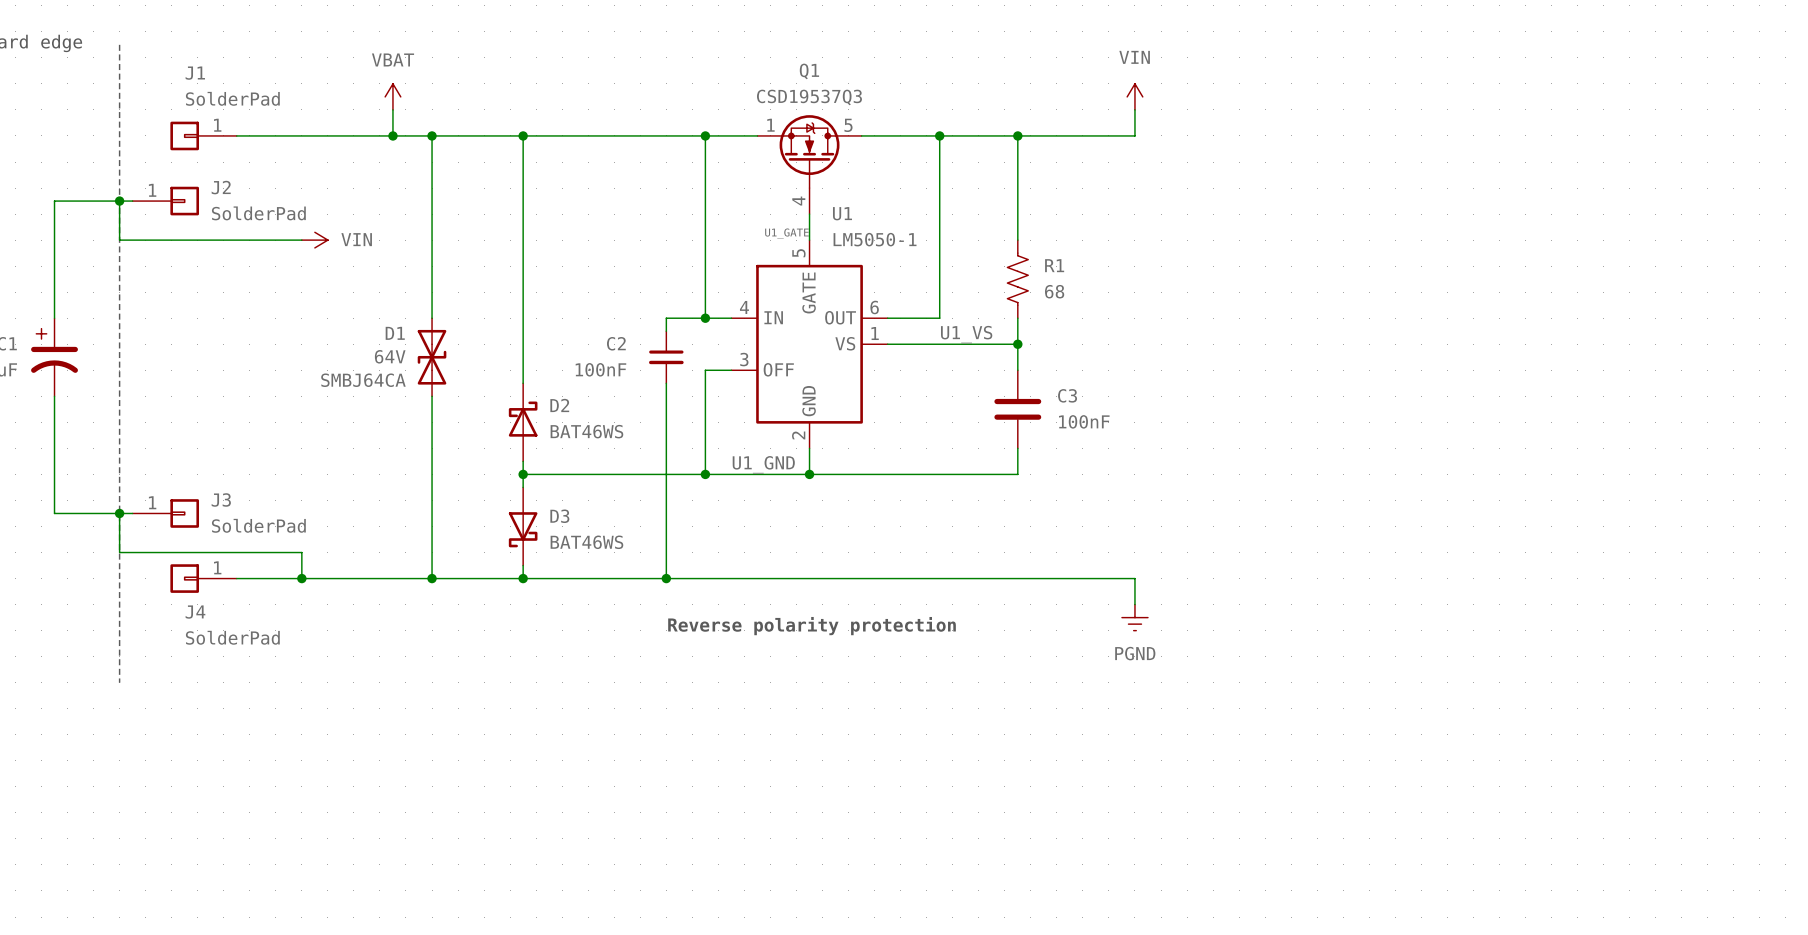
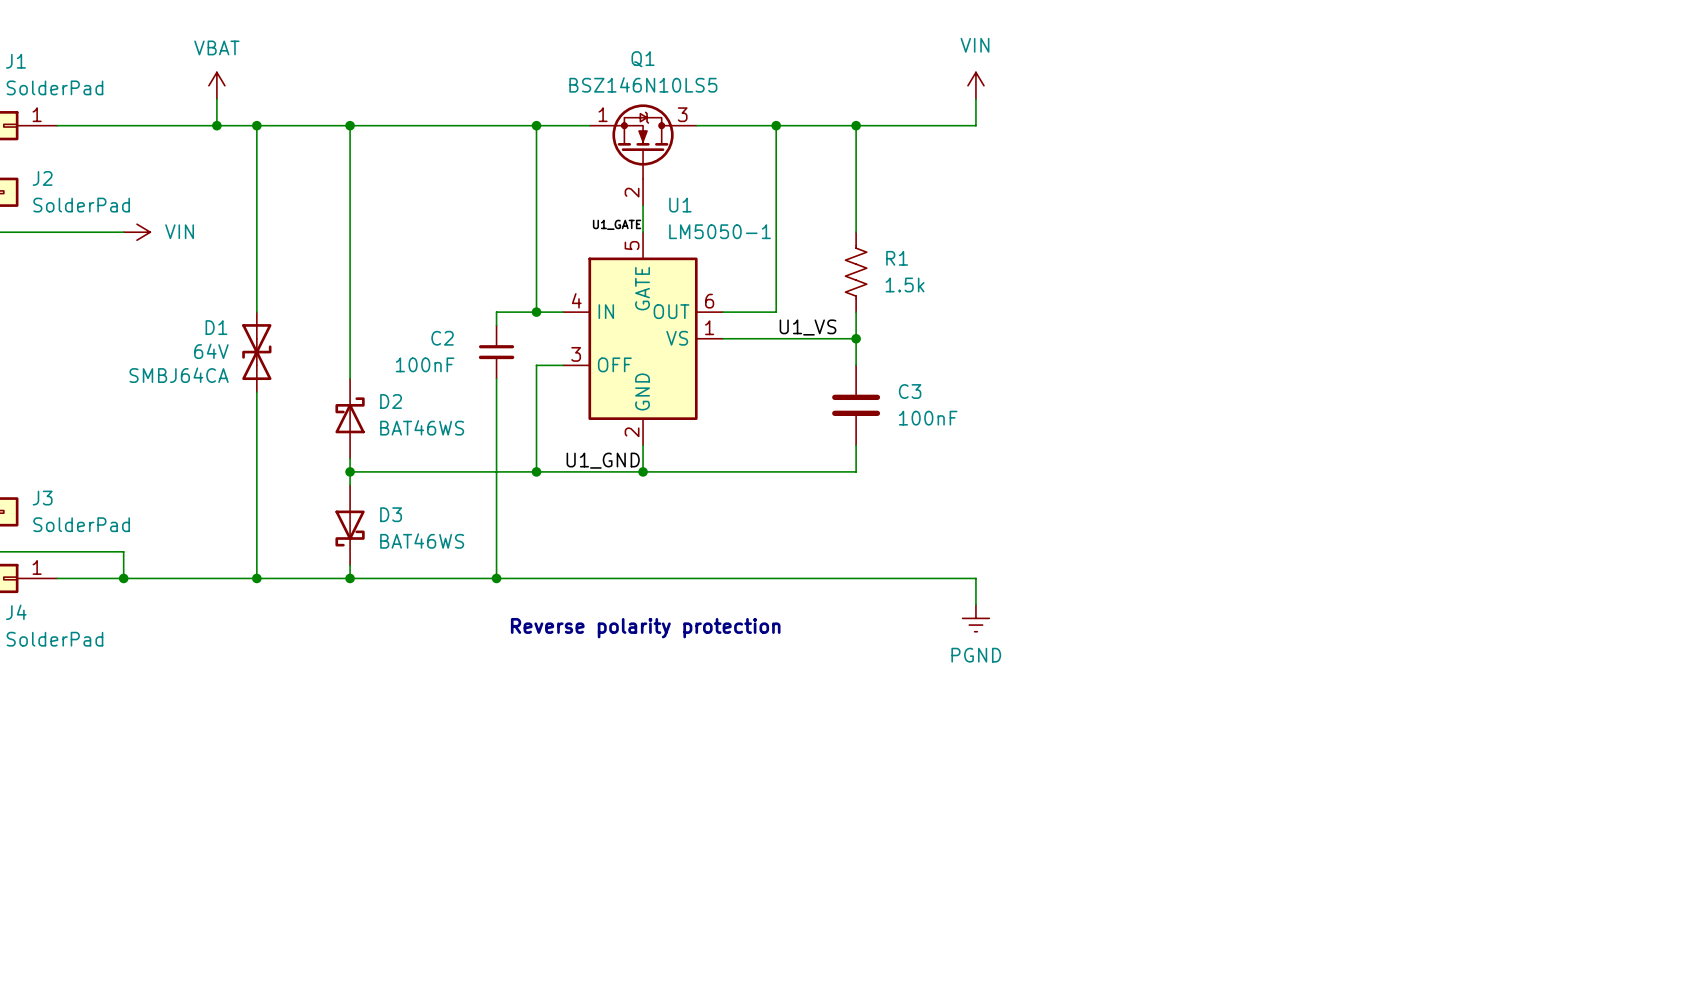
Q1 value: CSD19537Q3 (809, 97) -> BSZ146N10LS5 (643, 84)
Q1 pin number: 5 (848, 125) -> 3 (682, 114)
Q1 pin number: 4 (798, 201) -> 2 (632, 192)
R1 value: 68 (1054, 291) -> 1.5k (905, 284)

